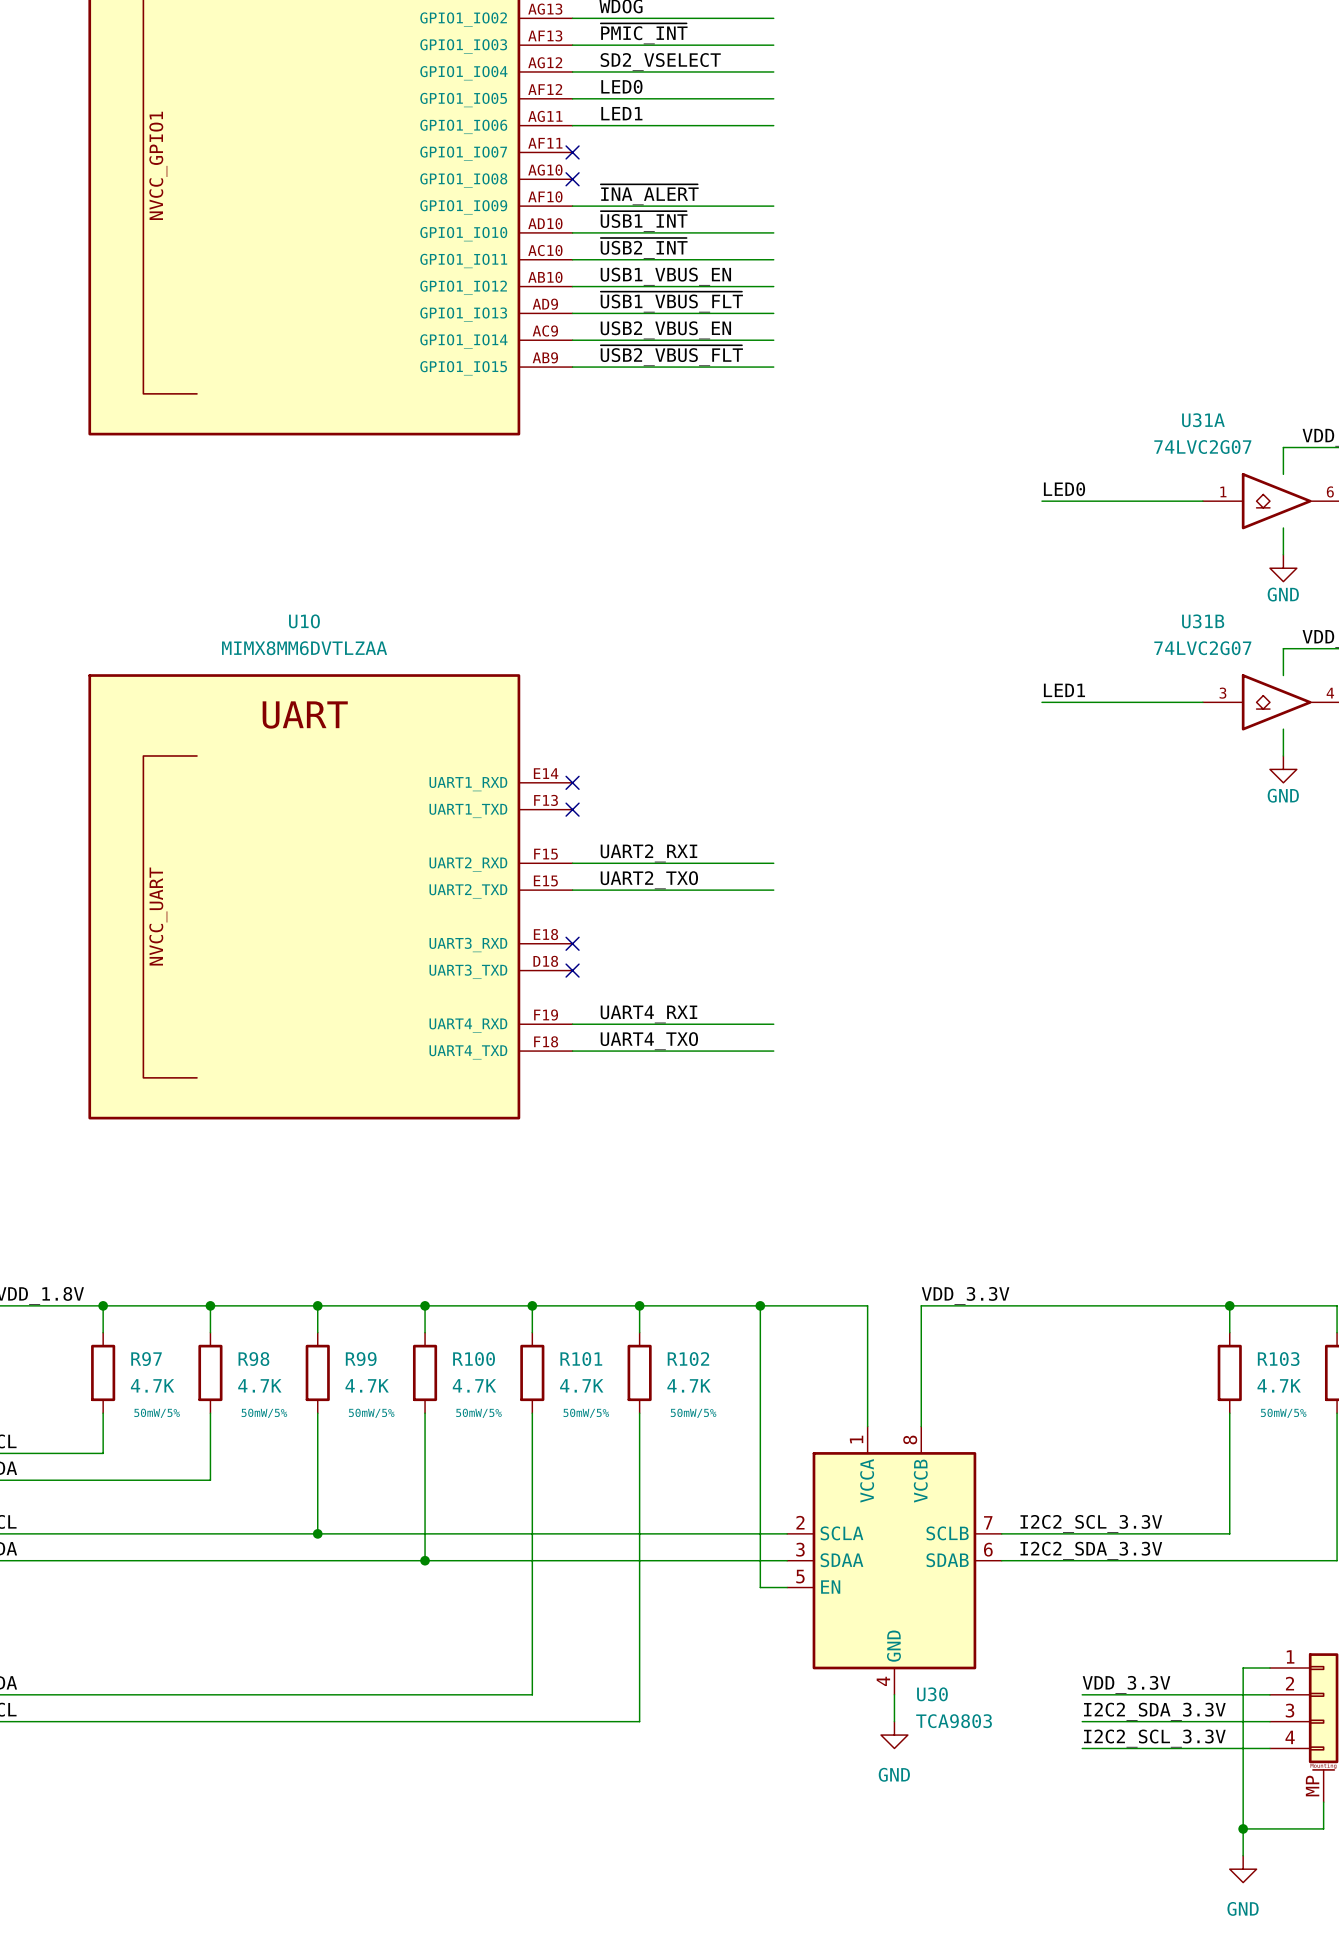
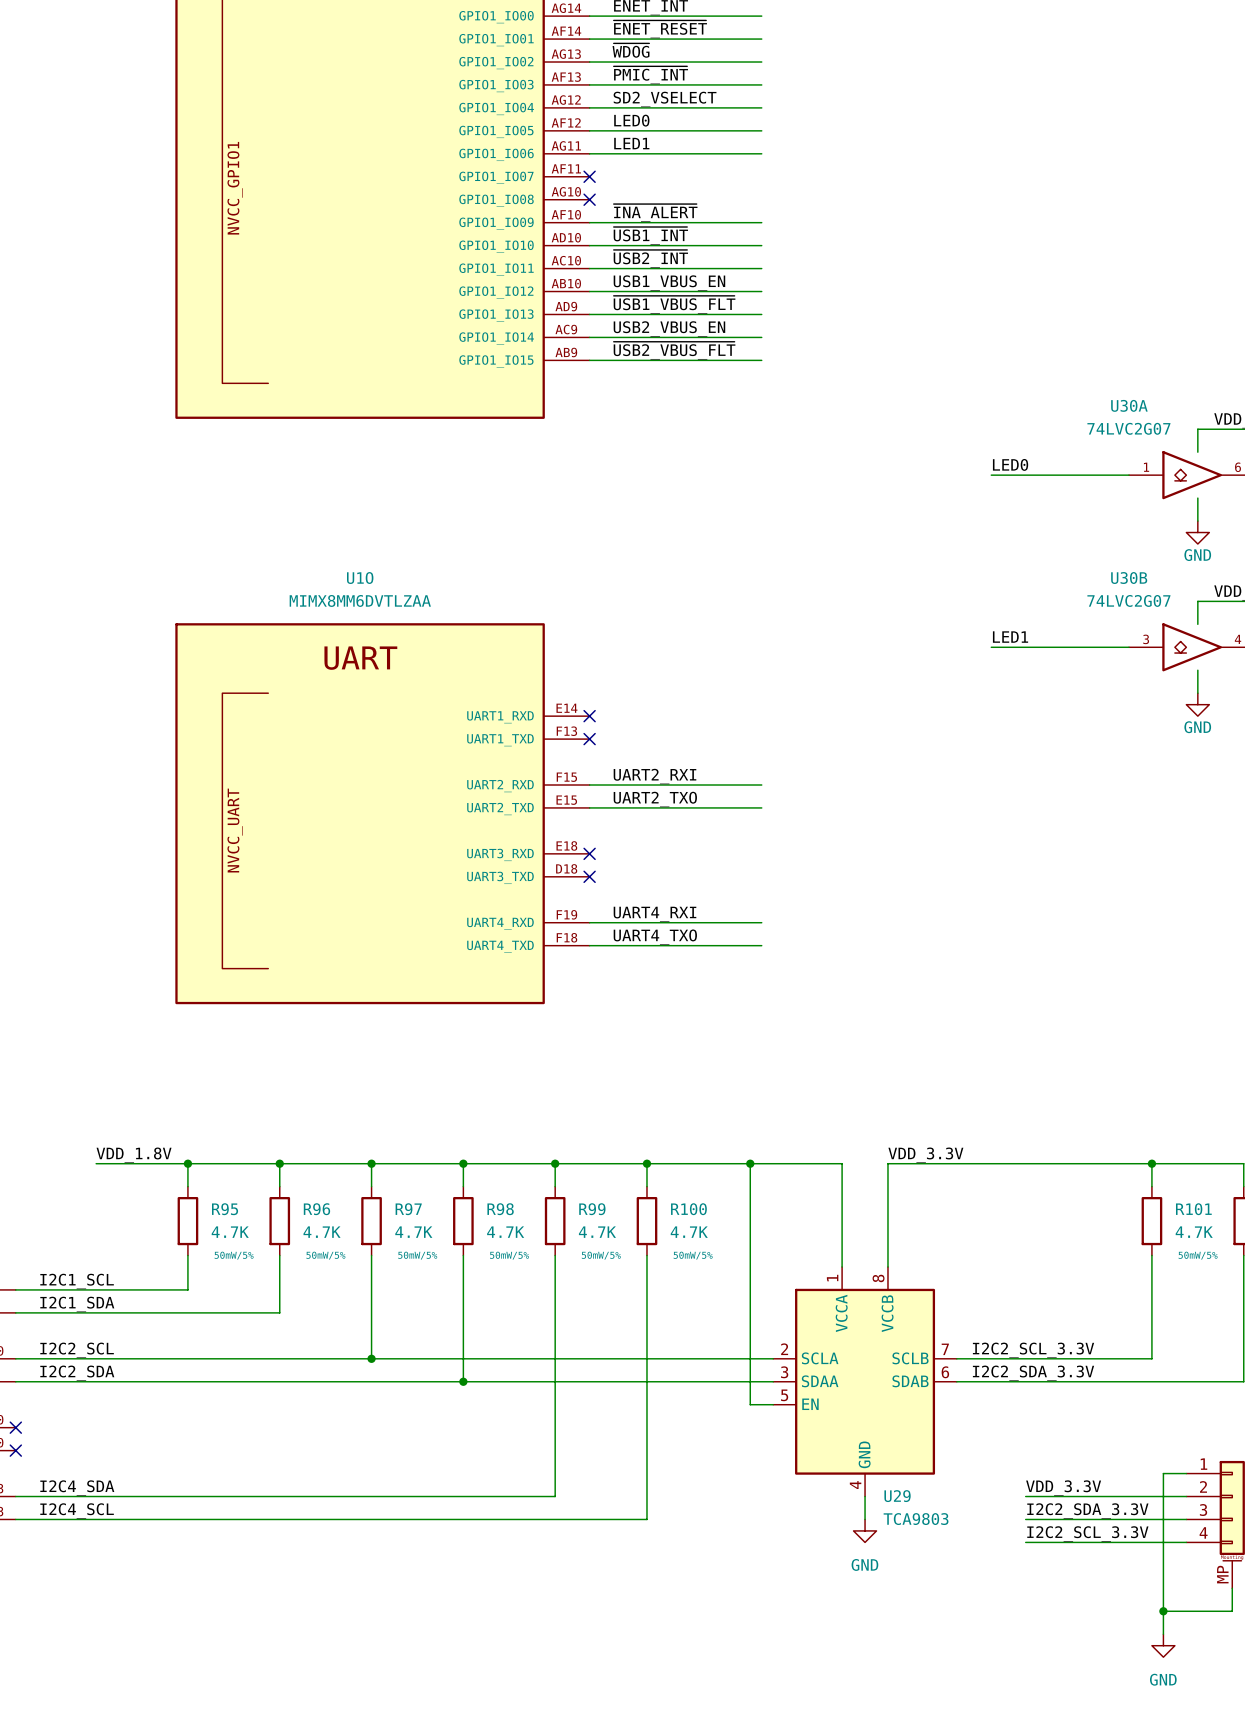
U31A name: U31A (1203, 420) -> U30A (1129, 405)
U31B name: U31B (1203, 621) -> U30B (1129, 578)
R97 name: R97 (146, 1359) -> R95 (225, 1209)
R98 name: R98 (253, 1359) -> R96 (316, 1209)
R99 name: R99 (361, 1359) -> R97 (408, 1209)
R100 name: R100 (474, 1359) -> R98 (500, 1209)
R101 name: R101 (581, 1359) -> R99 (592, 1209)
R102 name: R102 (688, 1359) -> R100 (688, 1209)
R103 name: R103 (1278, 1359) -> R101 (1193, 1209)
U30 name: U30 (932, 1694) -> U29 (897, 1496)

